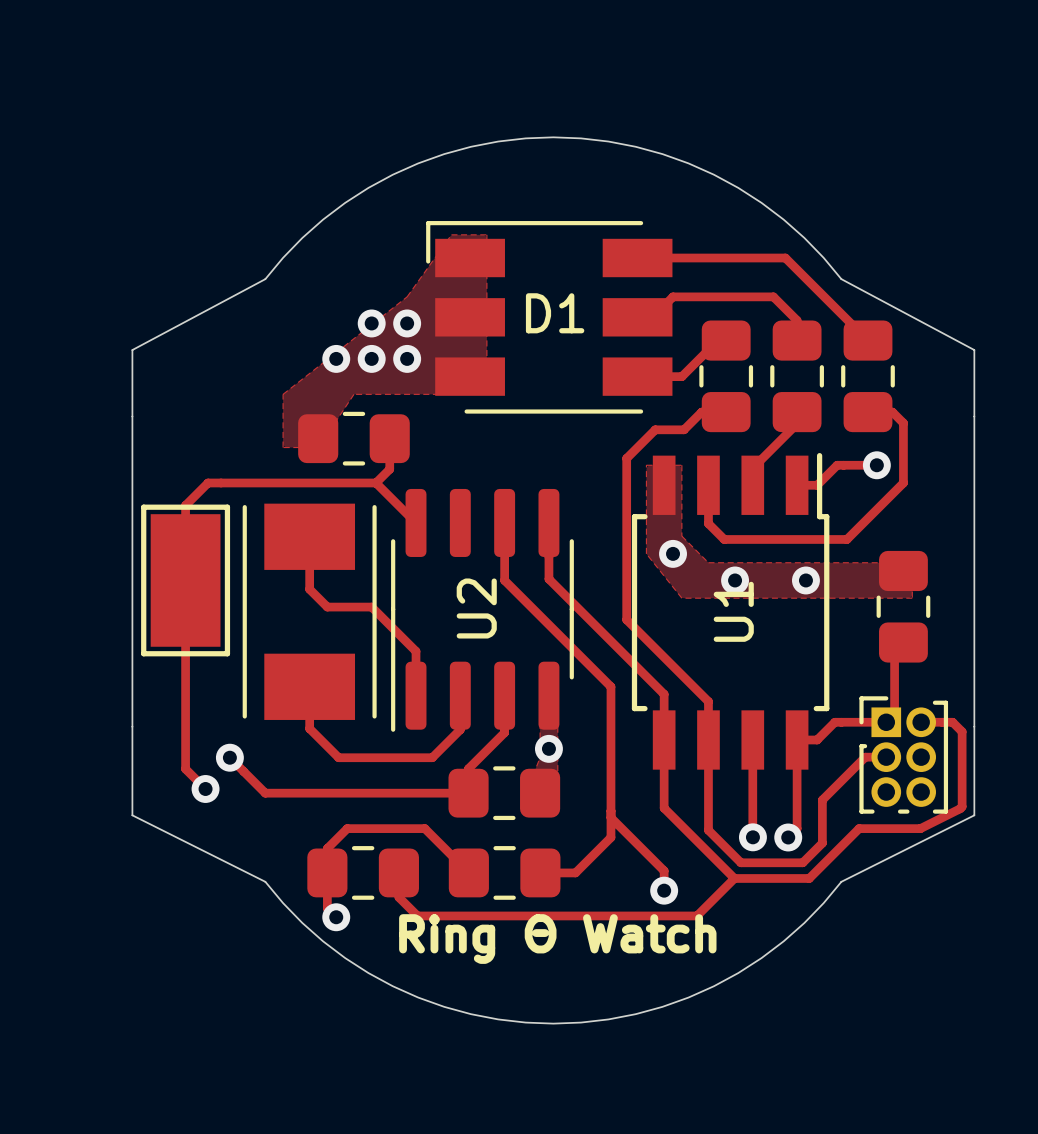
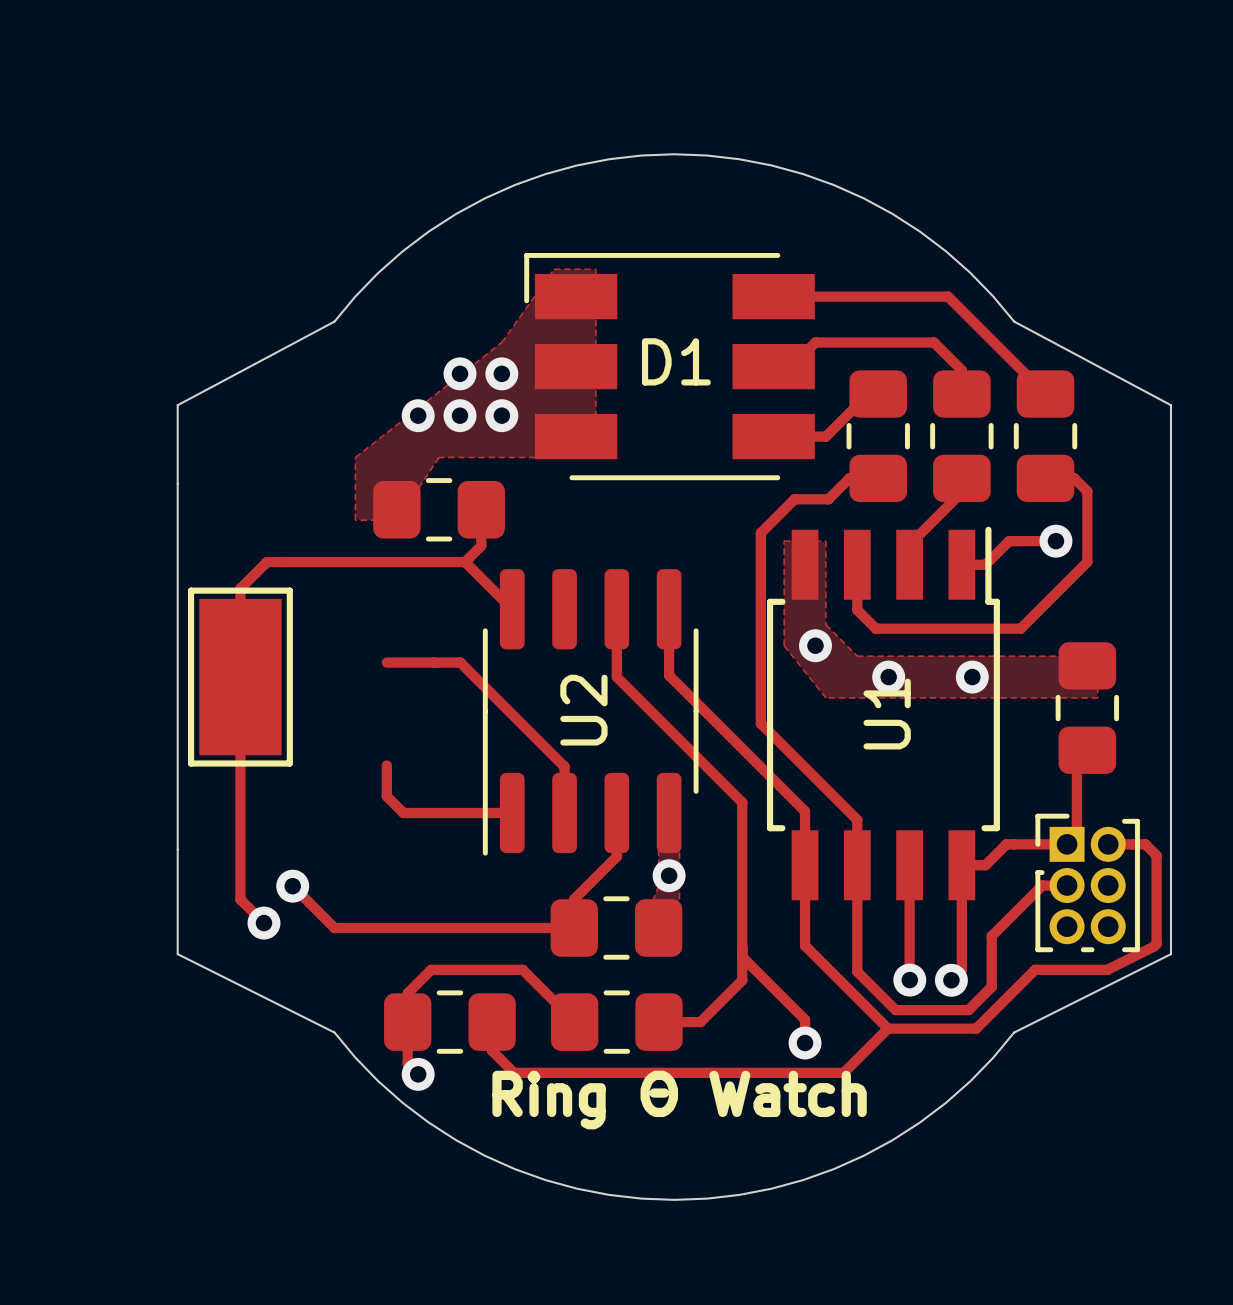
track: (309, 536) (309, 589) (327, 607) (371, 607) (416, 651) (416, 695) -> (386, 765) (386, 796) (403, 812) (512, 812)
part: (309, 611) -> none
track: (309, 686) (309, 728) (338, 757) (432, 757) (460, 729) (460, 695) -> (386, 662) (460, 662) (564, 766) (564, 812)

